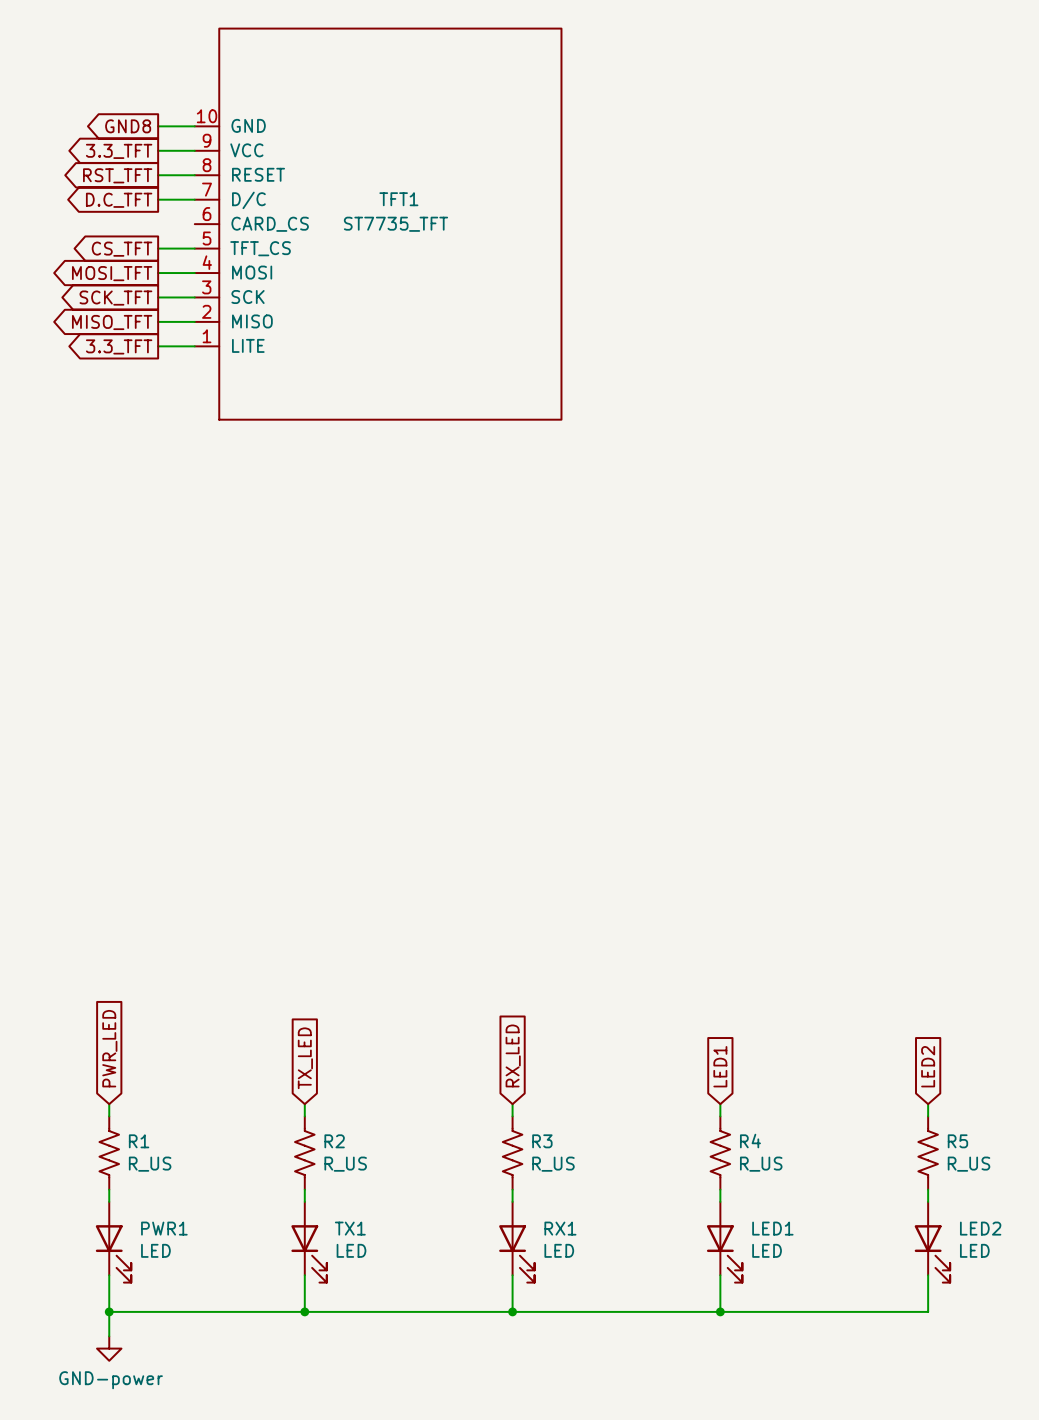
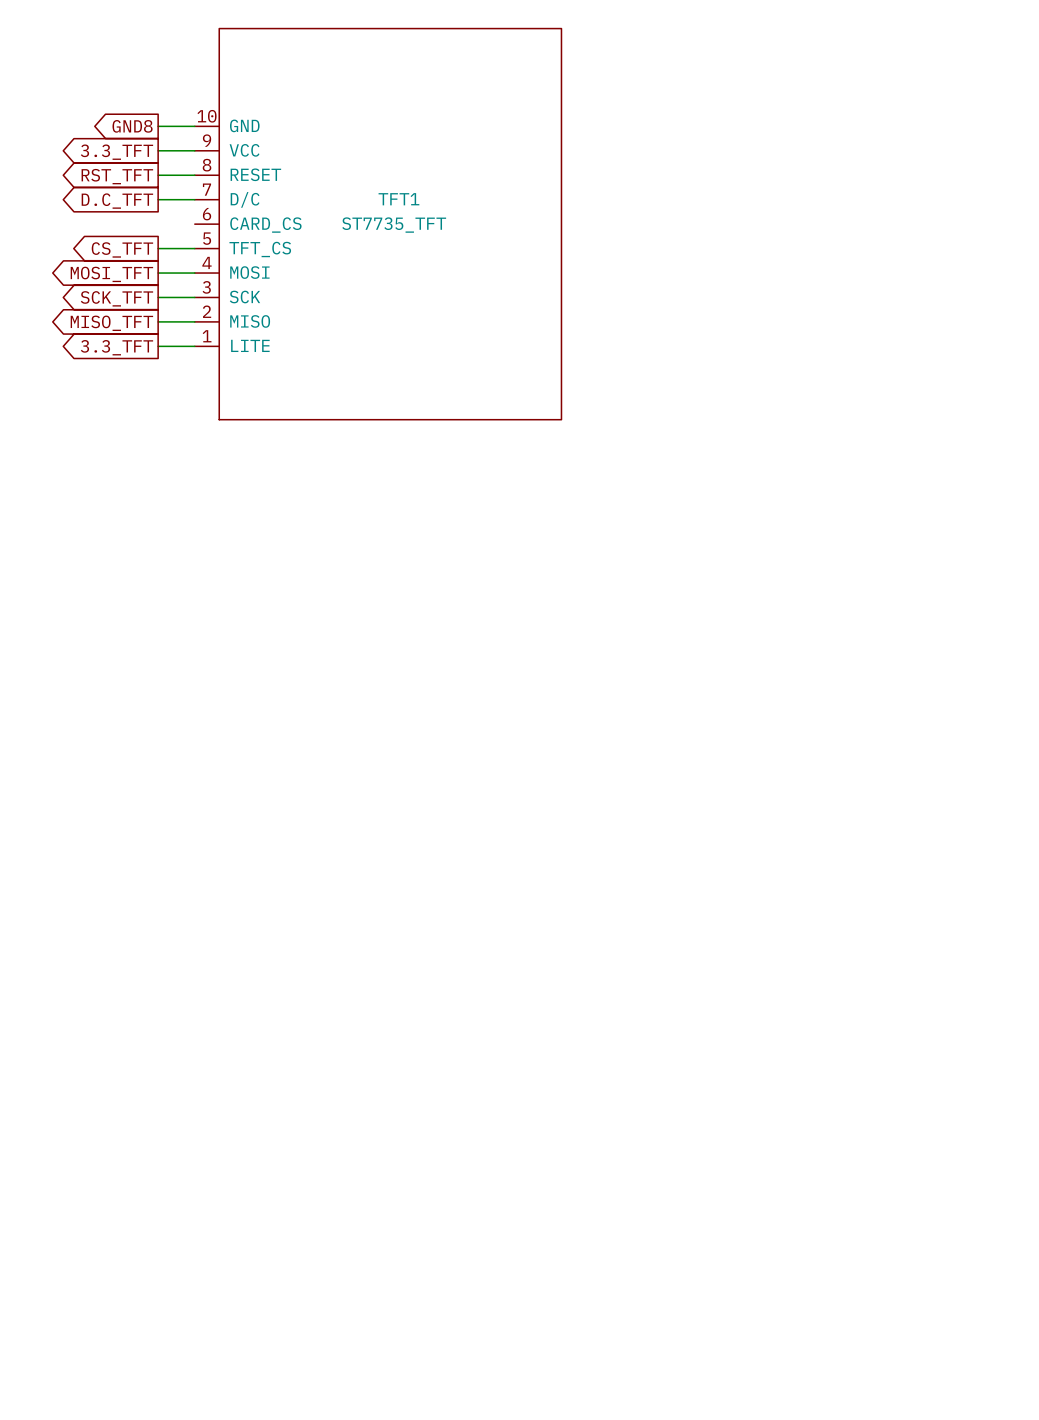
global label: PWR_LED (109, 1048) -> none
global label: RX_LED (513, 1055) -> none
global label: TX_LED (305, 1058) -> none
global label: LED1 (720, 1066) -> none
global label: LED2 (928, 1066) -> none
wire: (109, 1104) (109, 1116) -> none
wire: (304, 1104) (304, 1116) -> none
wire: (512, 1104) (512, 1116) -> none
wire: (720, 1104) (720, 1116) -> none
wire: (928, 1104) (928, 1116) -> none
R1: R_US (109, 1153) -> none
R2: R_US (304, 1153) -> none
R3: R_US (512, 1153) -> none
R4: R_US (720, 1153) -> none
R5: R_US (928, 1153) -> none
wire: (109, 1189) (109, 1201) -> none
wire: (304, 1189) (304, 1201) -> none
wire: (512, 1189) (512, 1201) -> none
wire: (720, 1189) (720, 1201) -> none
wire: (928, 1189) (928, 1201) -> none
PWR1: LED (113, 1242) -> none
TX1: LED (309, 1242) -> none
RX1: LED (516, 1242) -> none
LED1: LED (724, 1242) -> none
LED2: LED (932, 1242) -> none
wire: (109, 1275) (109, 1336) -> none
wire: (304, 1275) (304, 1311) -> none
wire: (512, 1275) (512, 1311) -> none
wire: (720, 1275) (720, 1311) -> none
wire: (928, 1275) (928, 1311) (109, 1311) -> none
junction: (109, 1311) -> none
junction: (304, 1311) -> none
junction: (512, 1311) -> none
junction: (720, 1311) -> none
power symbol: GND-power (109, 1348) -> none

